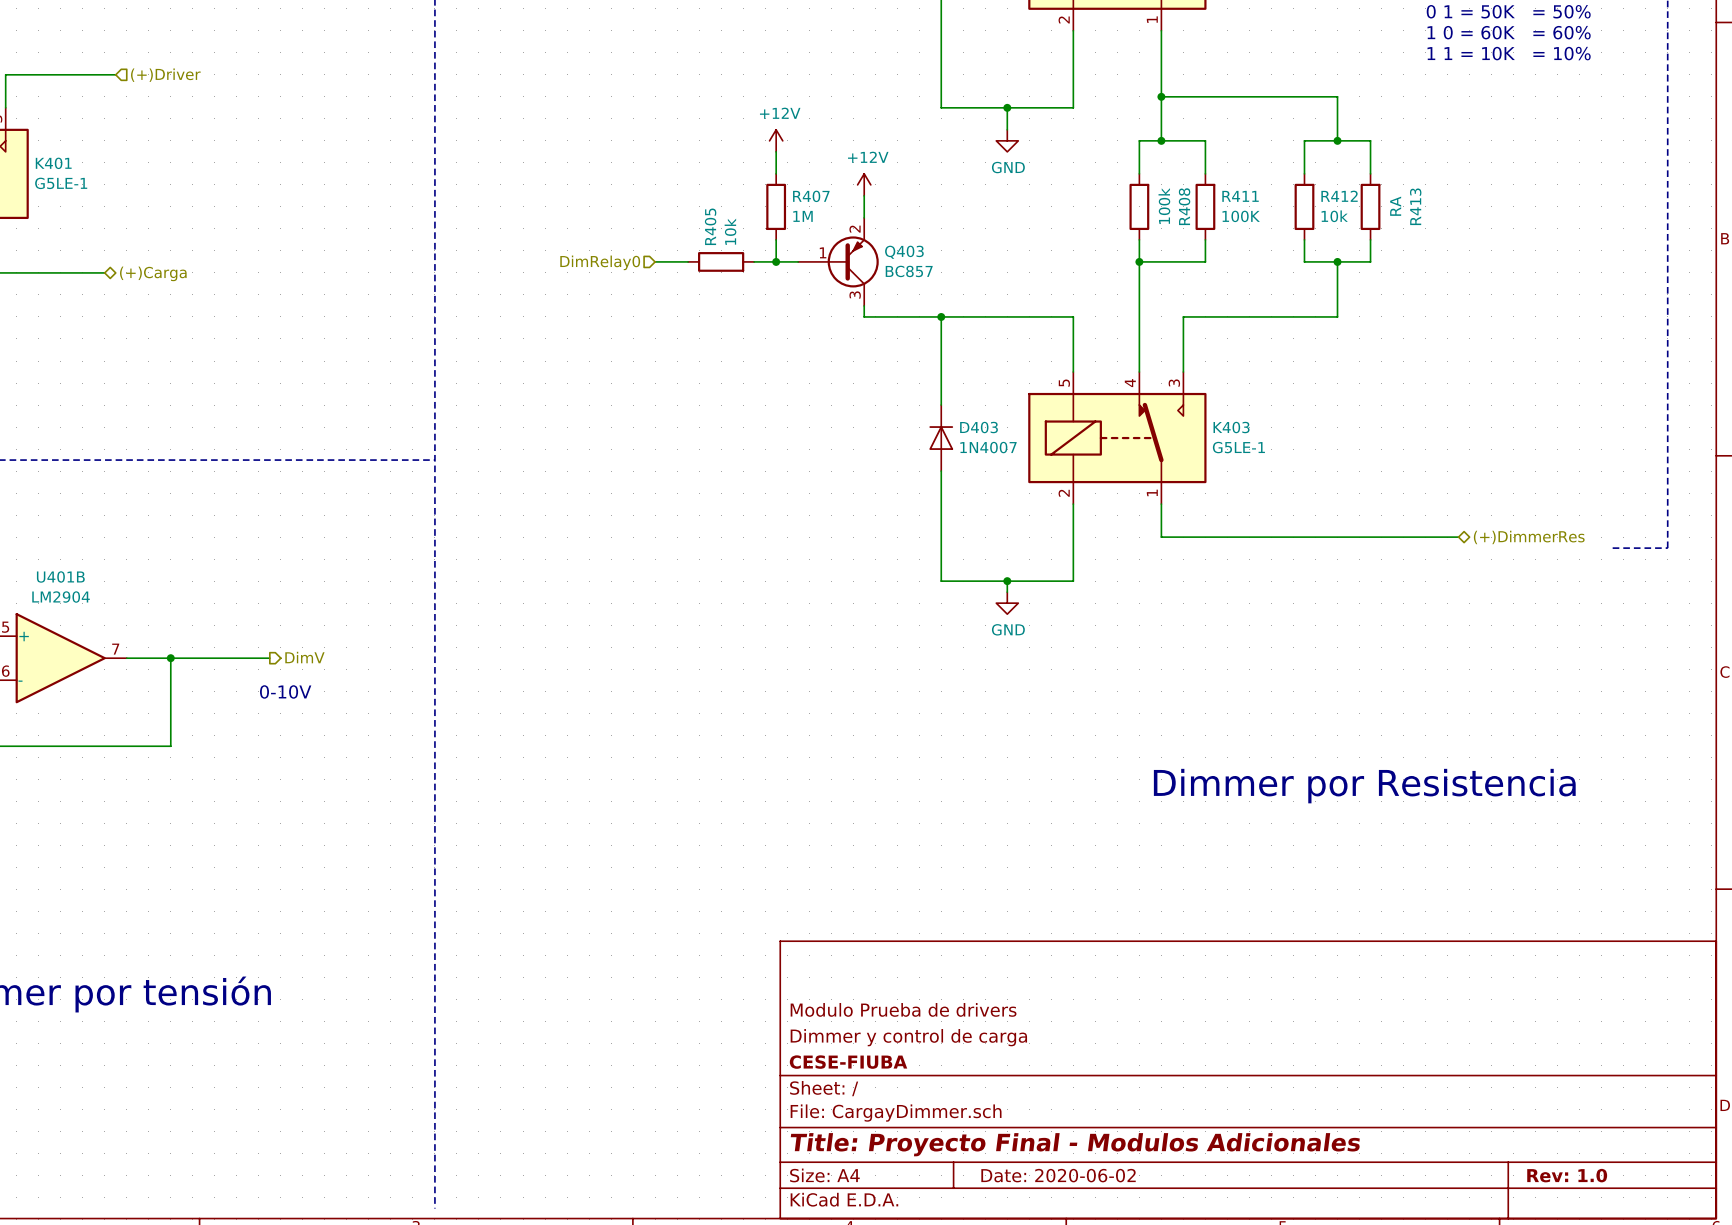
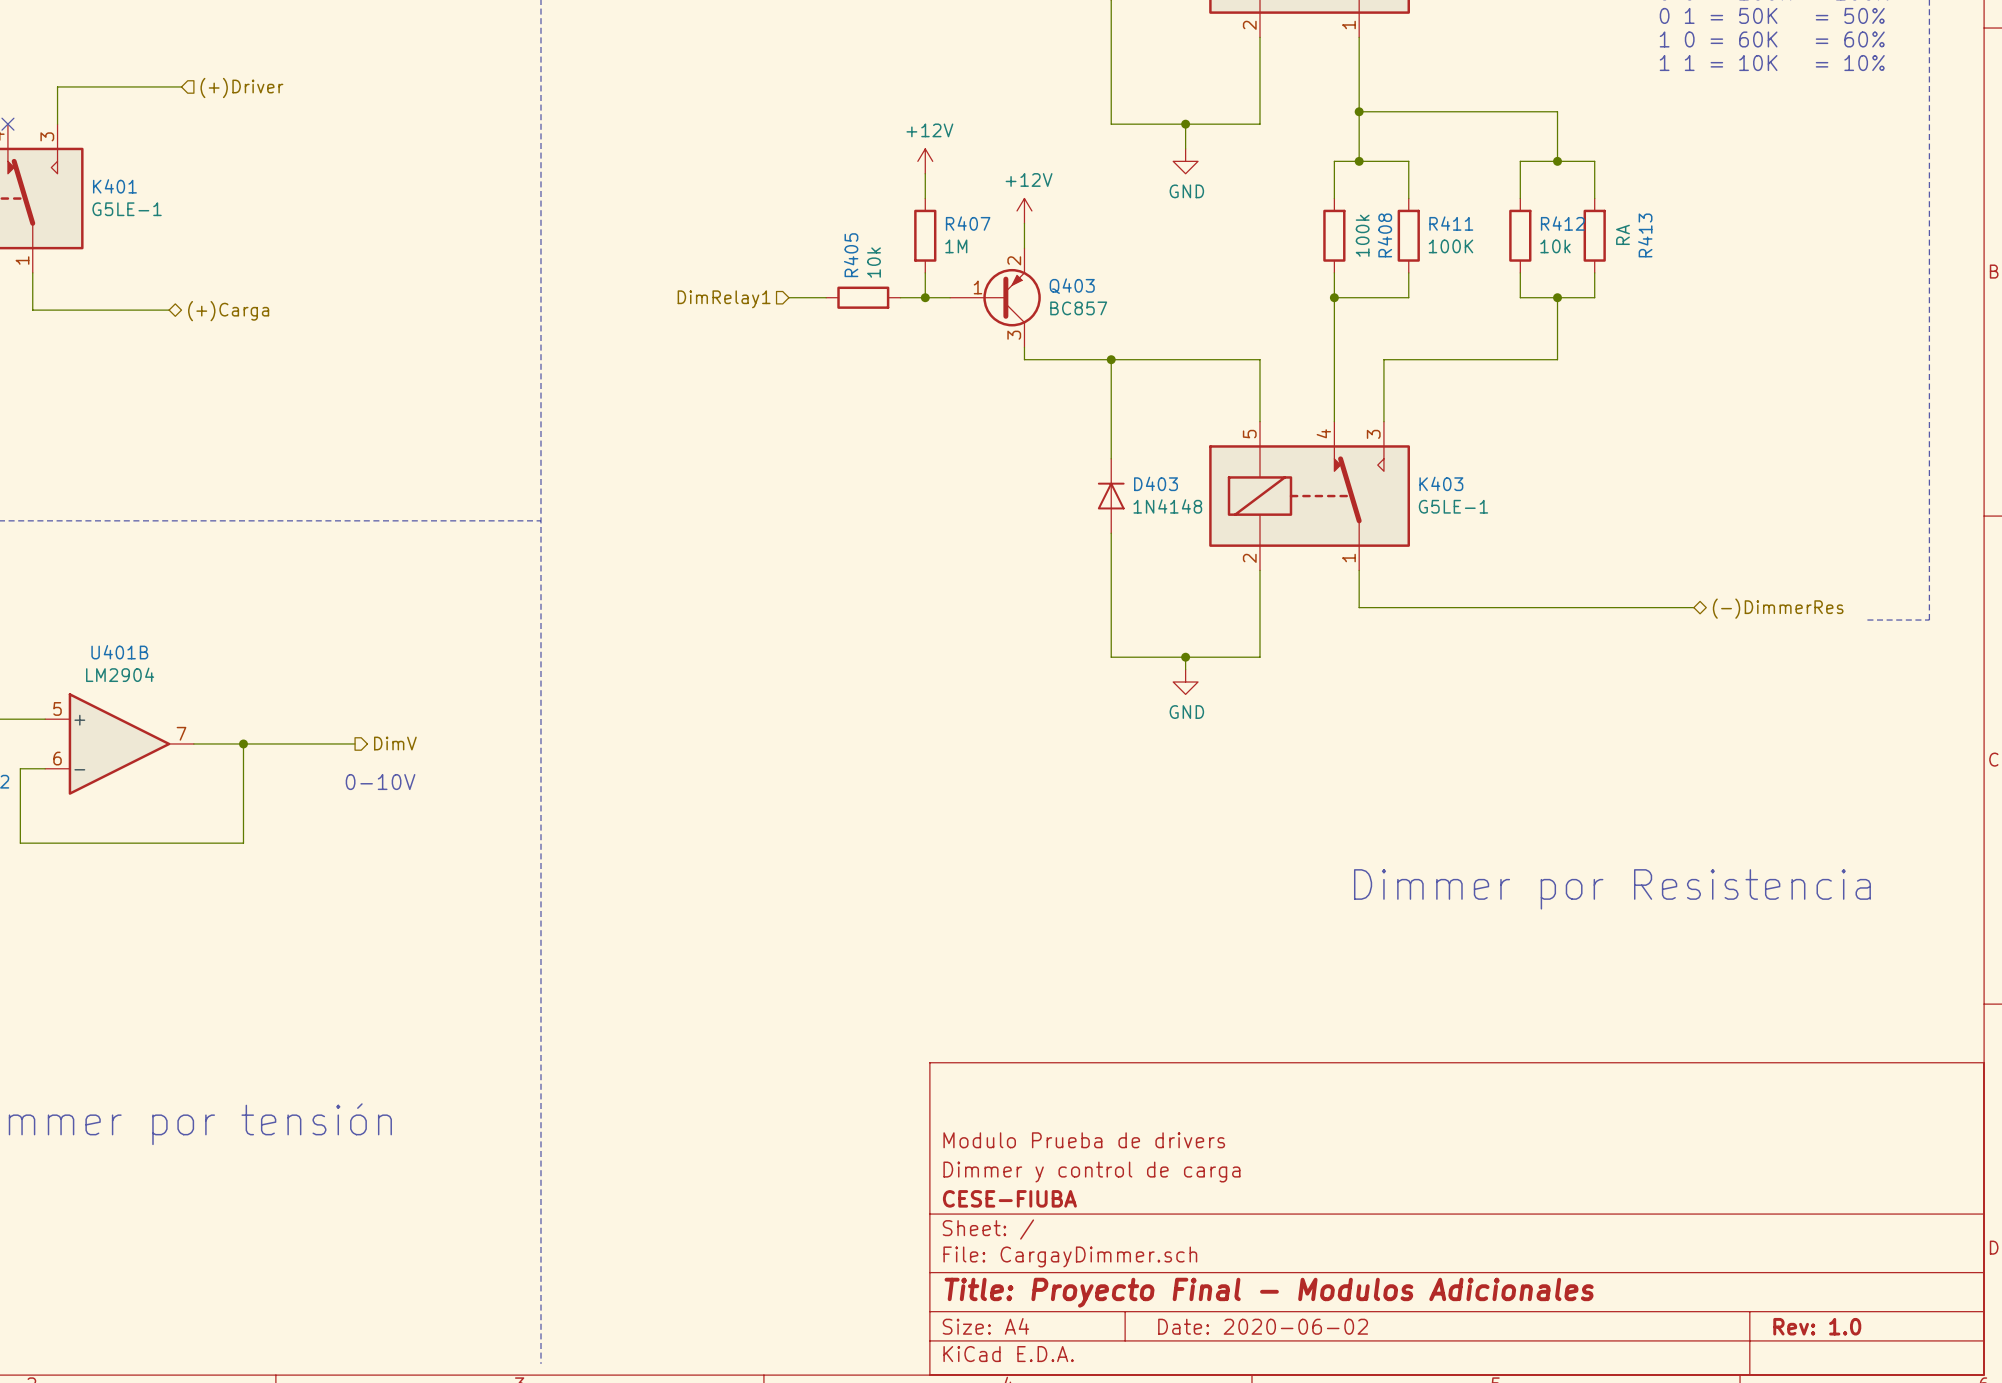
hierarchical label: DimRelay0 (600, 262) -> DimRelay1 (724, 299)
D403 value: 1N4007 (988, 447) -> 1N4148 (1167, 506)
hierarchical label: (+)DimmerRes (1529, 537) -> (-)DimmerRes (1778, 608)

